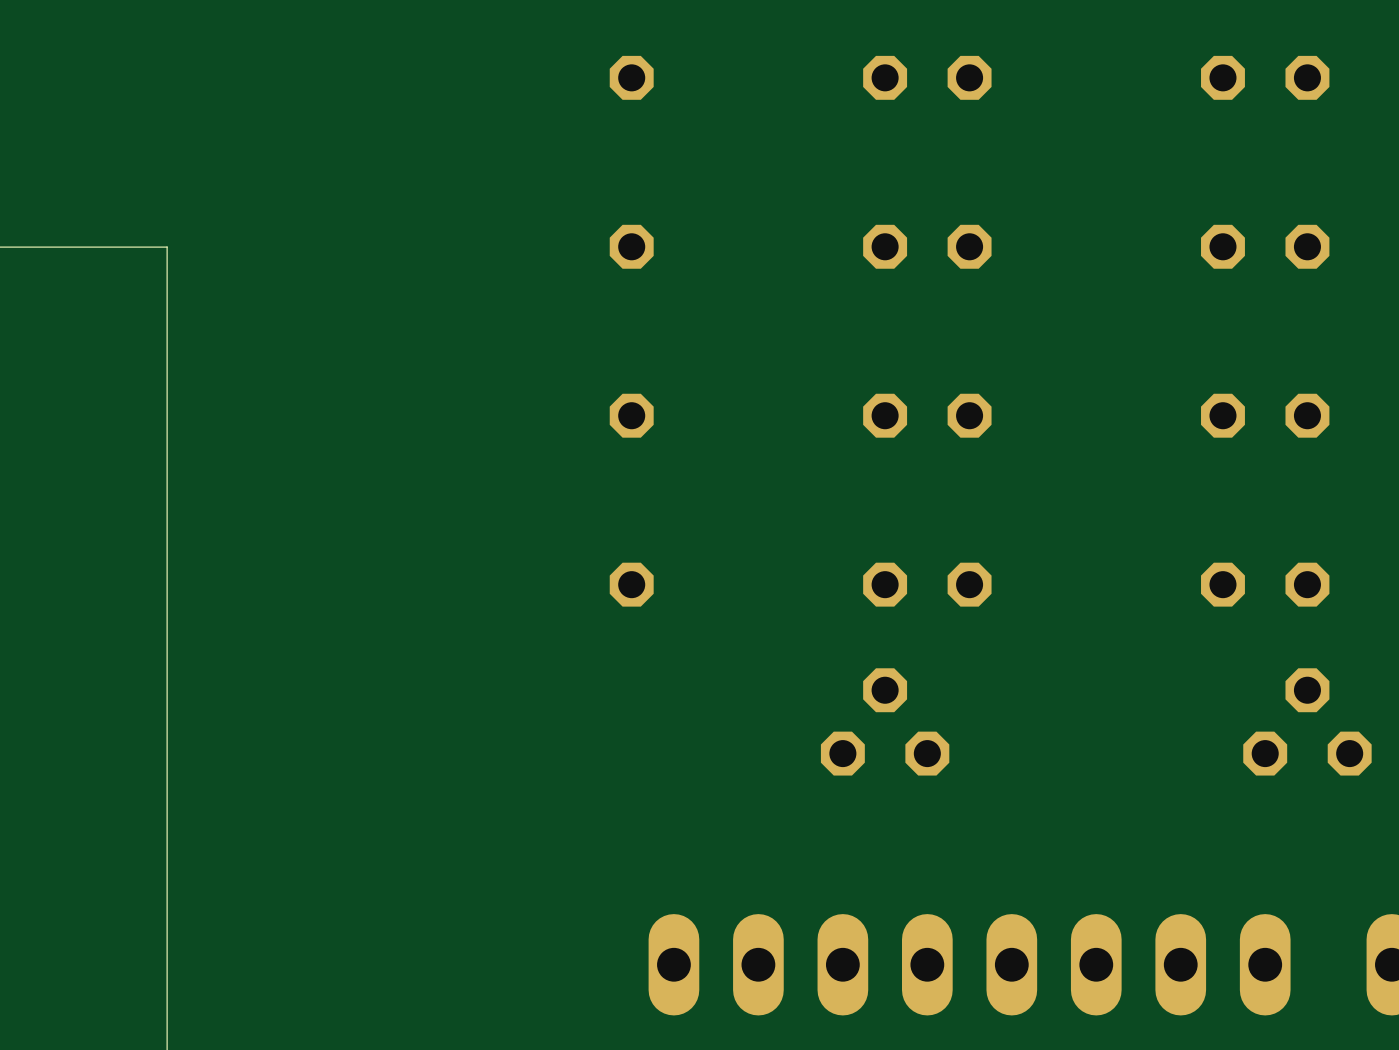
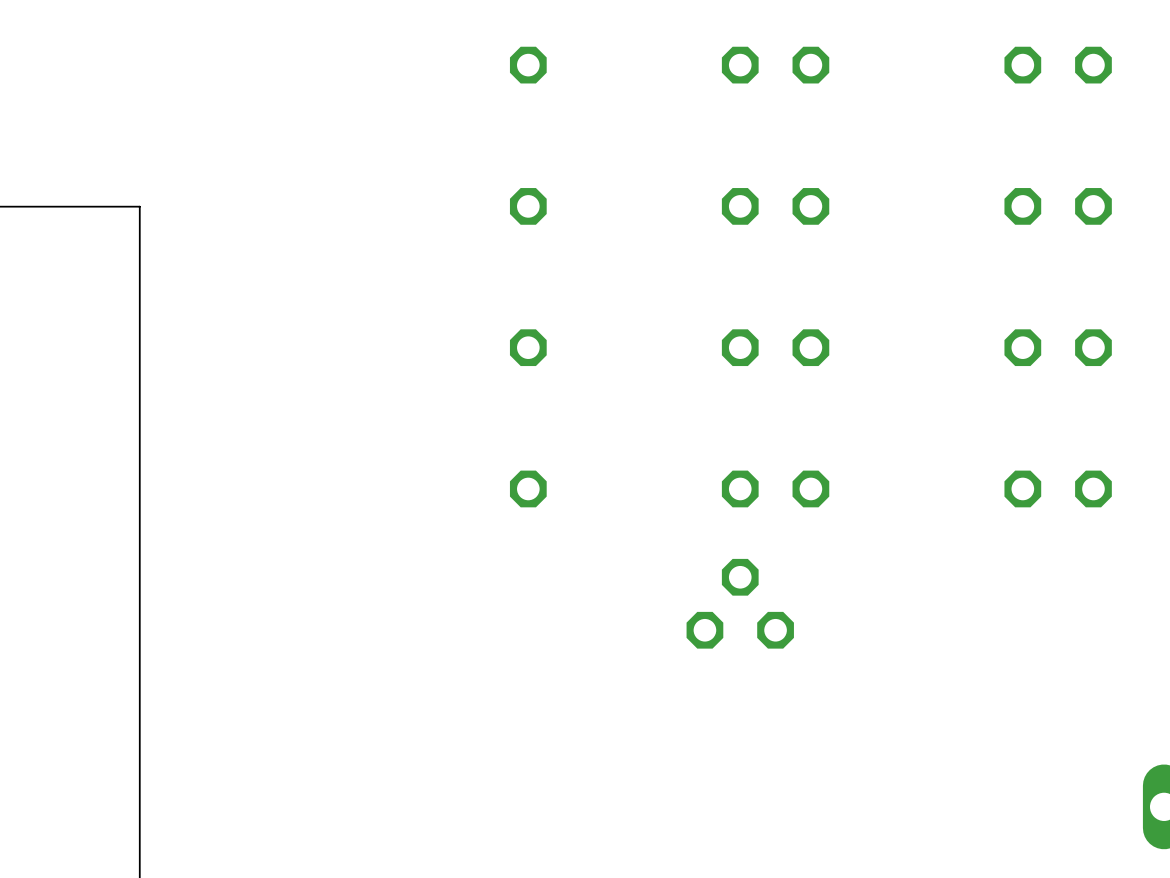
part: (1307, 721) -> none
part: (969, 964) -> none

